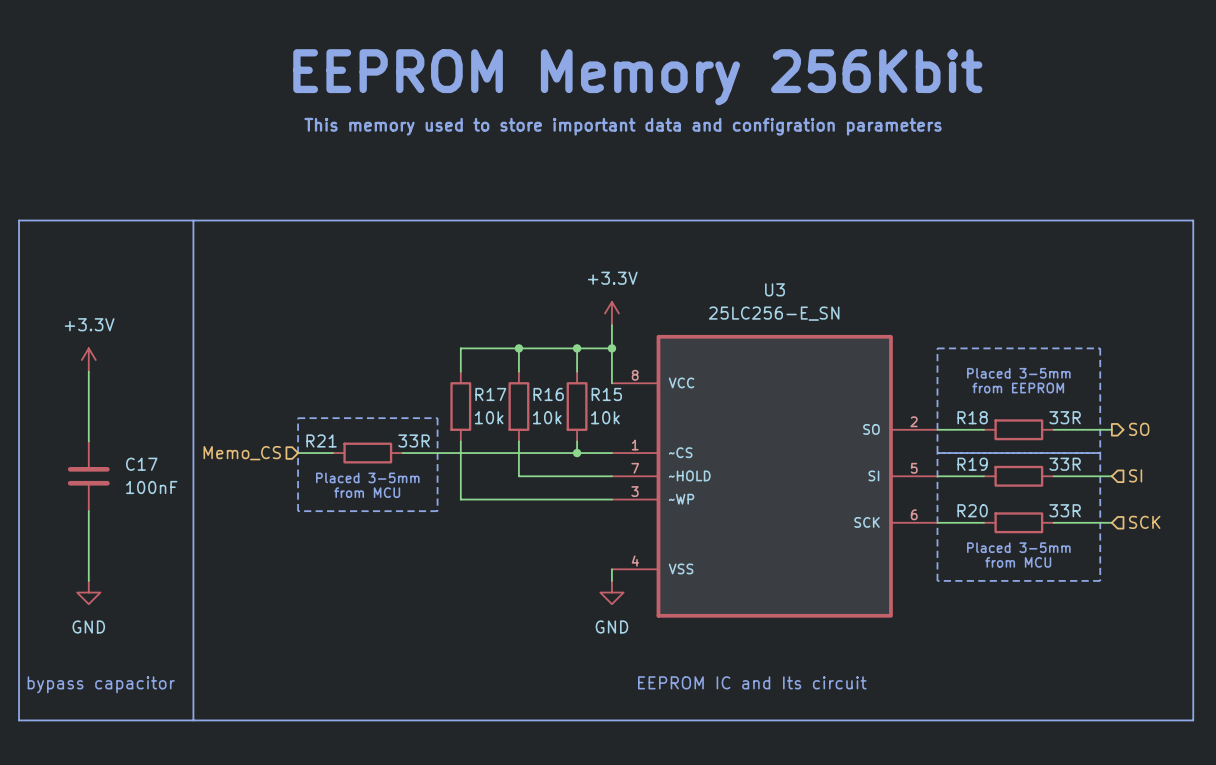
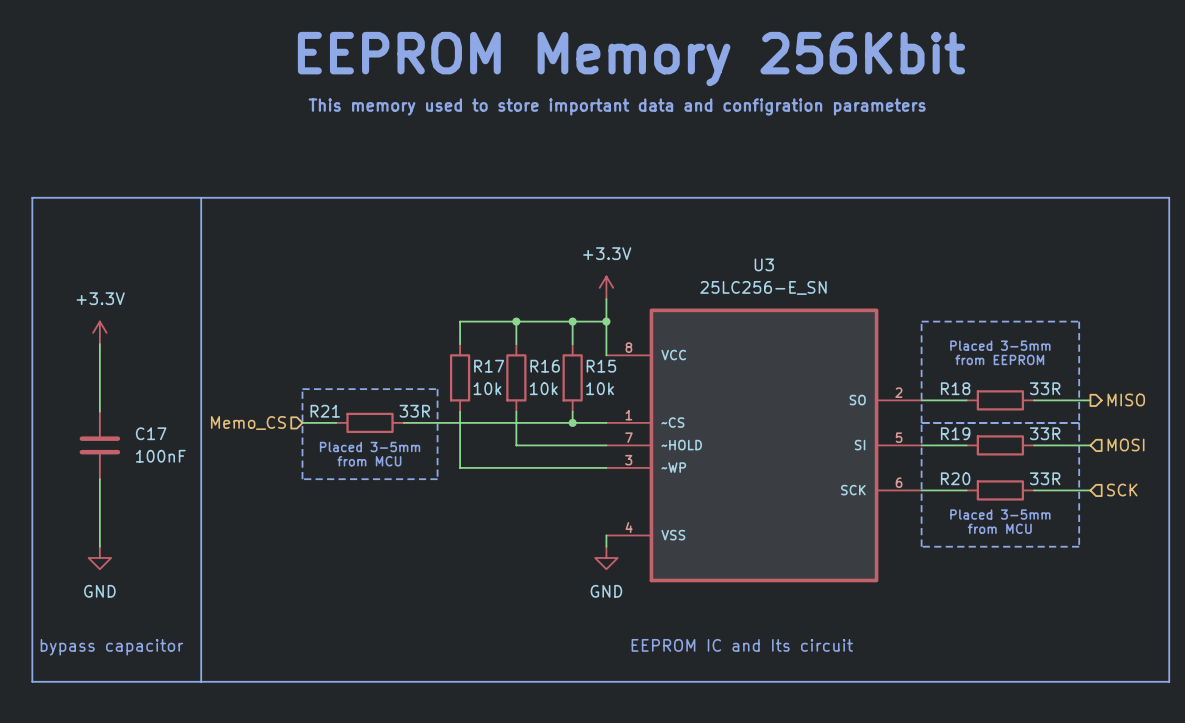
hierarchical label: SO (1139, 429) -> MISO (1126, 399)
hierarchical label: SI (1135, 475) -> MOSI (1125, 444)

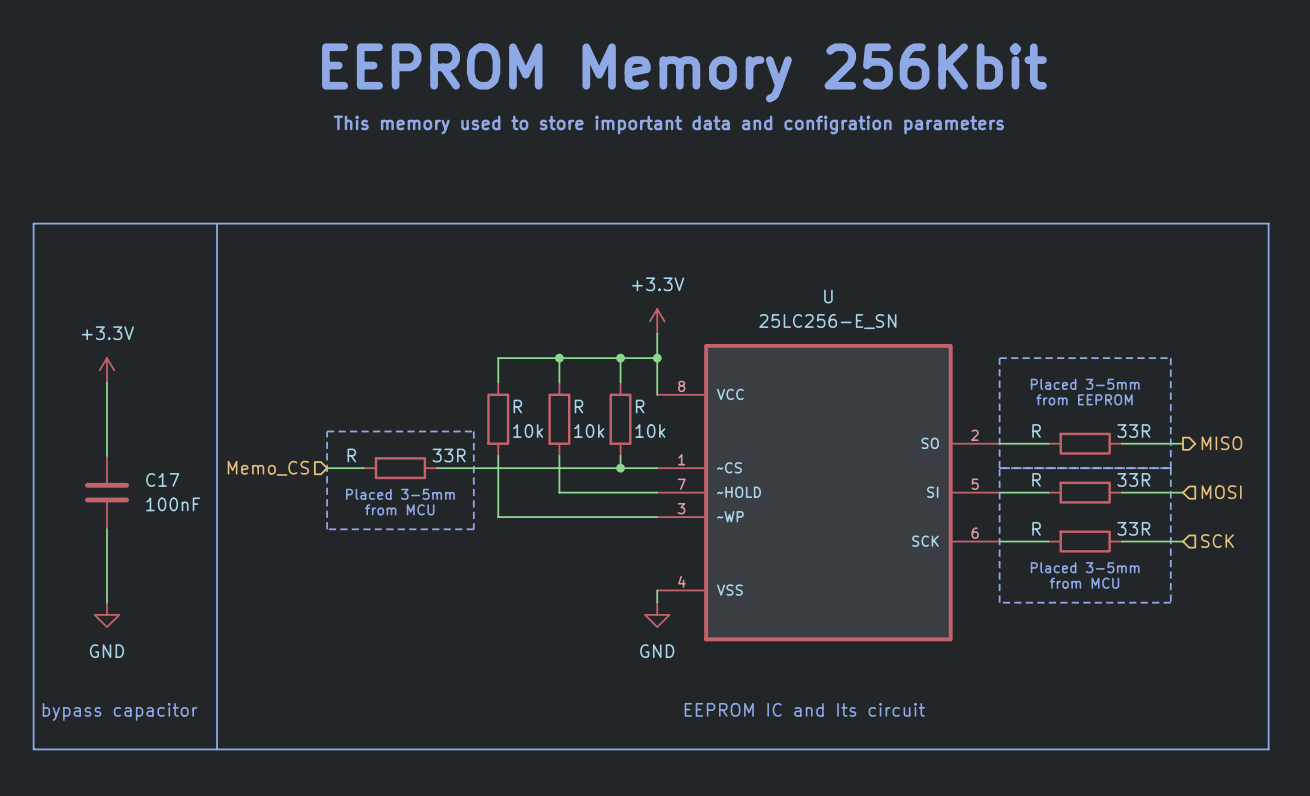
U3 name: U3 (764, 264) -> U (828, 296)
R17 name: R17 (489, 366) -> R (517, 406)
R16 name: R16 (545, 366) -> R (579, 406)
R15 name: R15 (601, 366) -> R (640, 406)
R18 name: R18 (955, 388) -> R (1036, 431)
R21 name: R21 (325, 411) -> R (351, 455)
R19 name: R19 (955, 433) -> R (1036, 479)
R20 name: R20 (955, 478) -> R (1036, 528)

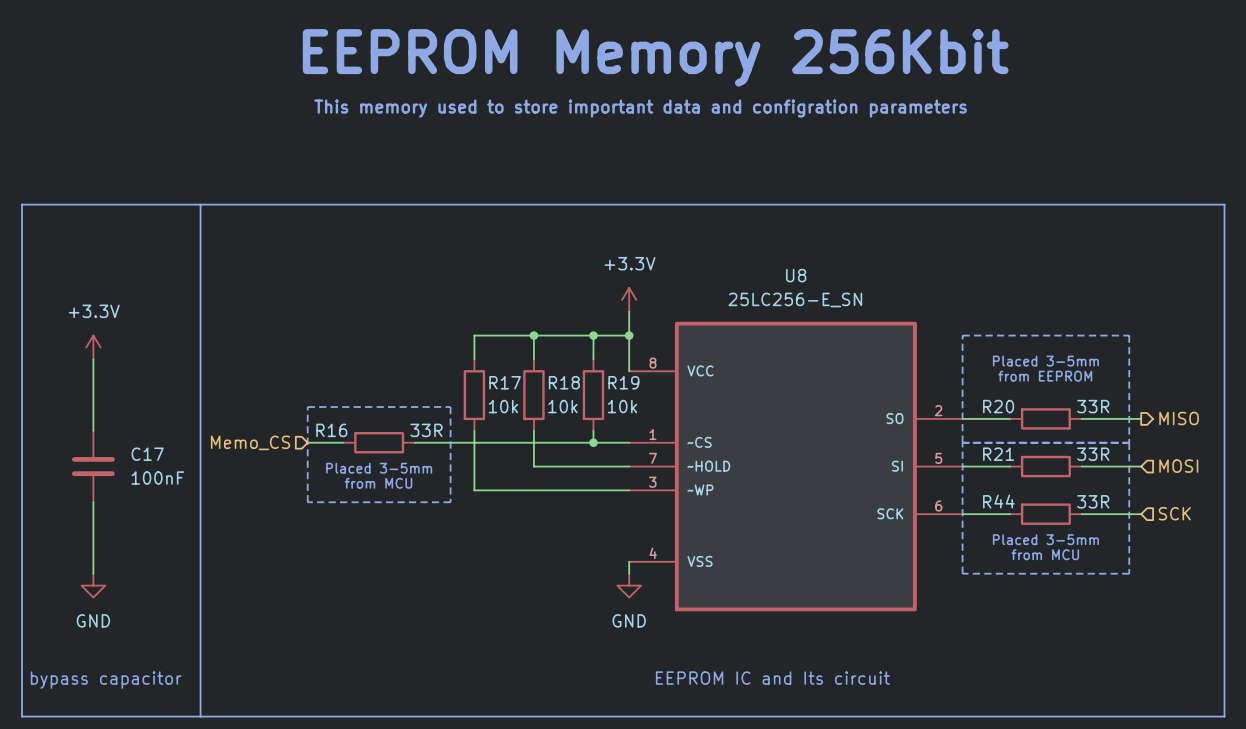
U name: U (828, 296) -> U8 (796, 275)
R name: R (517, 406) -> R17 (505, 382)
R name: R (579, 406) -> R18 (564, 382)
R name: R (640, 406) -> R19 (623, 382)
R name: R (1036, 431) -> R20 (998, 406)
R name: R (351, 455) -> R16 (331, 430)
R name: R (1036, 479) -> R21 (998, 454)
R name: R (1036, 528) -> R44 (998, 501)

